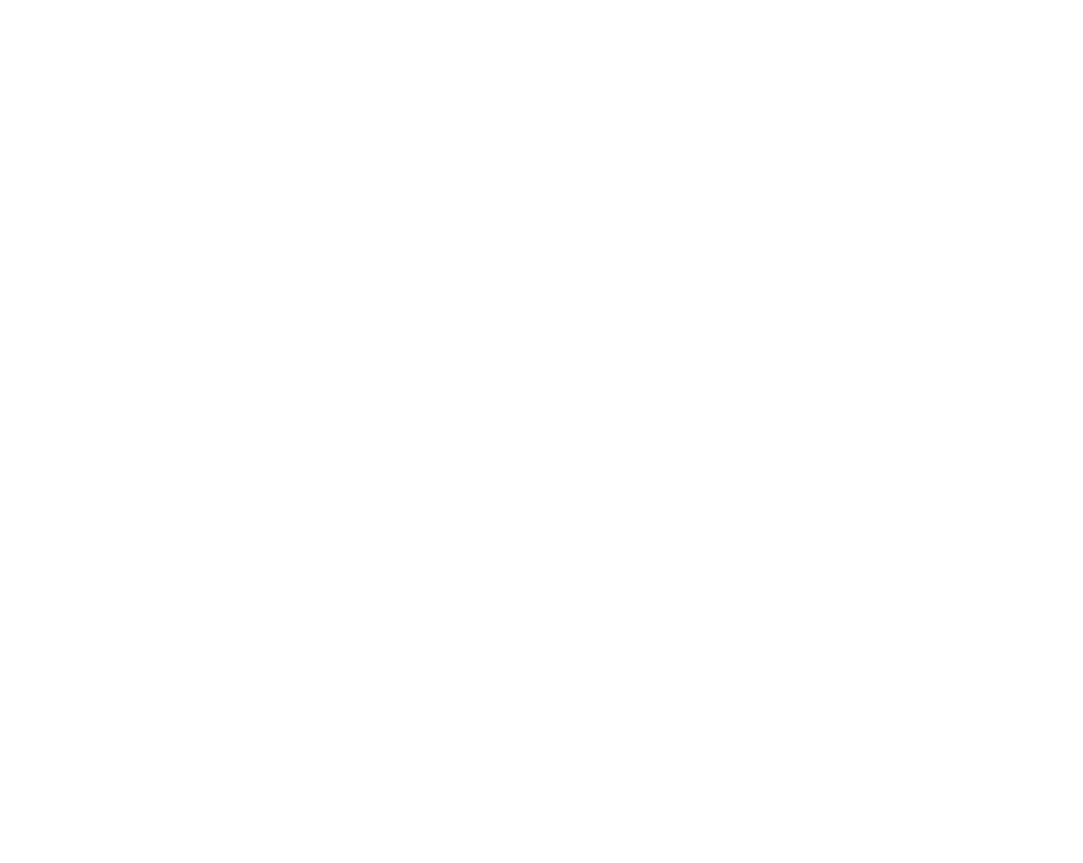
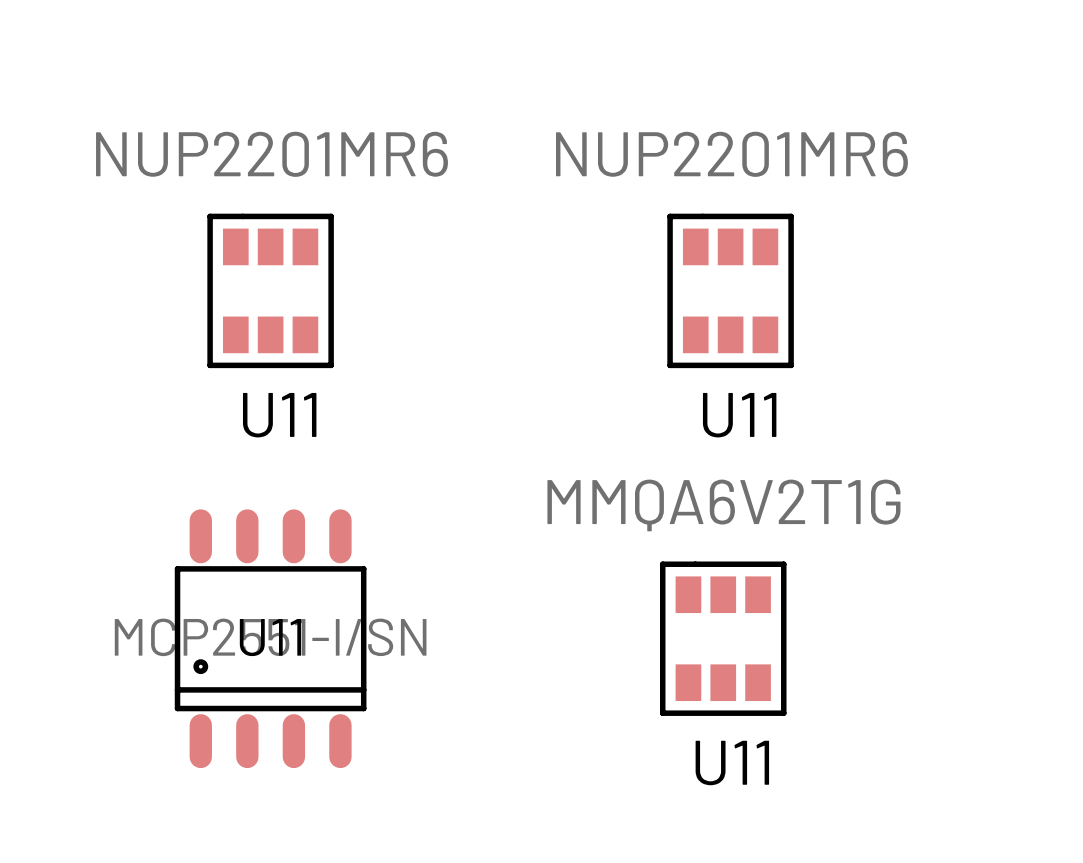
U11: none -> NUP2201MR6 (270, 290)
U11: none -> NUP2201MR6 (730, 290)
U11: none -> MCP2551-I/SN (270, 638)
U11: none -> MMQA6V2T1G (723, 638)

